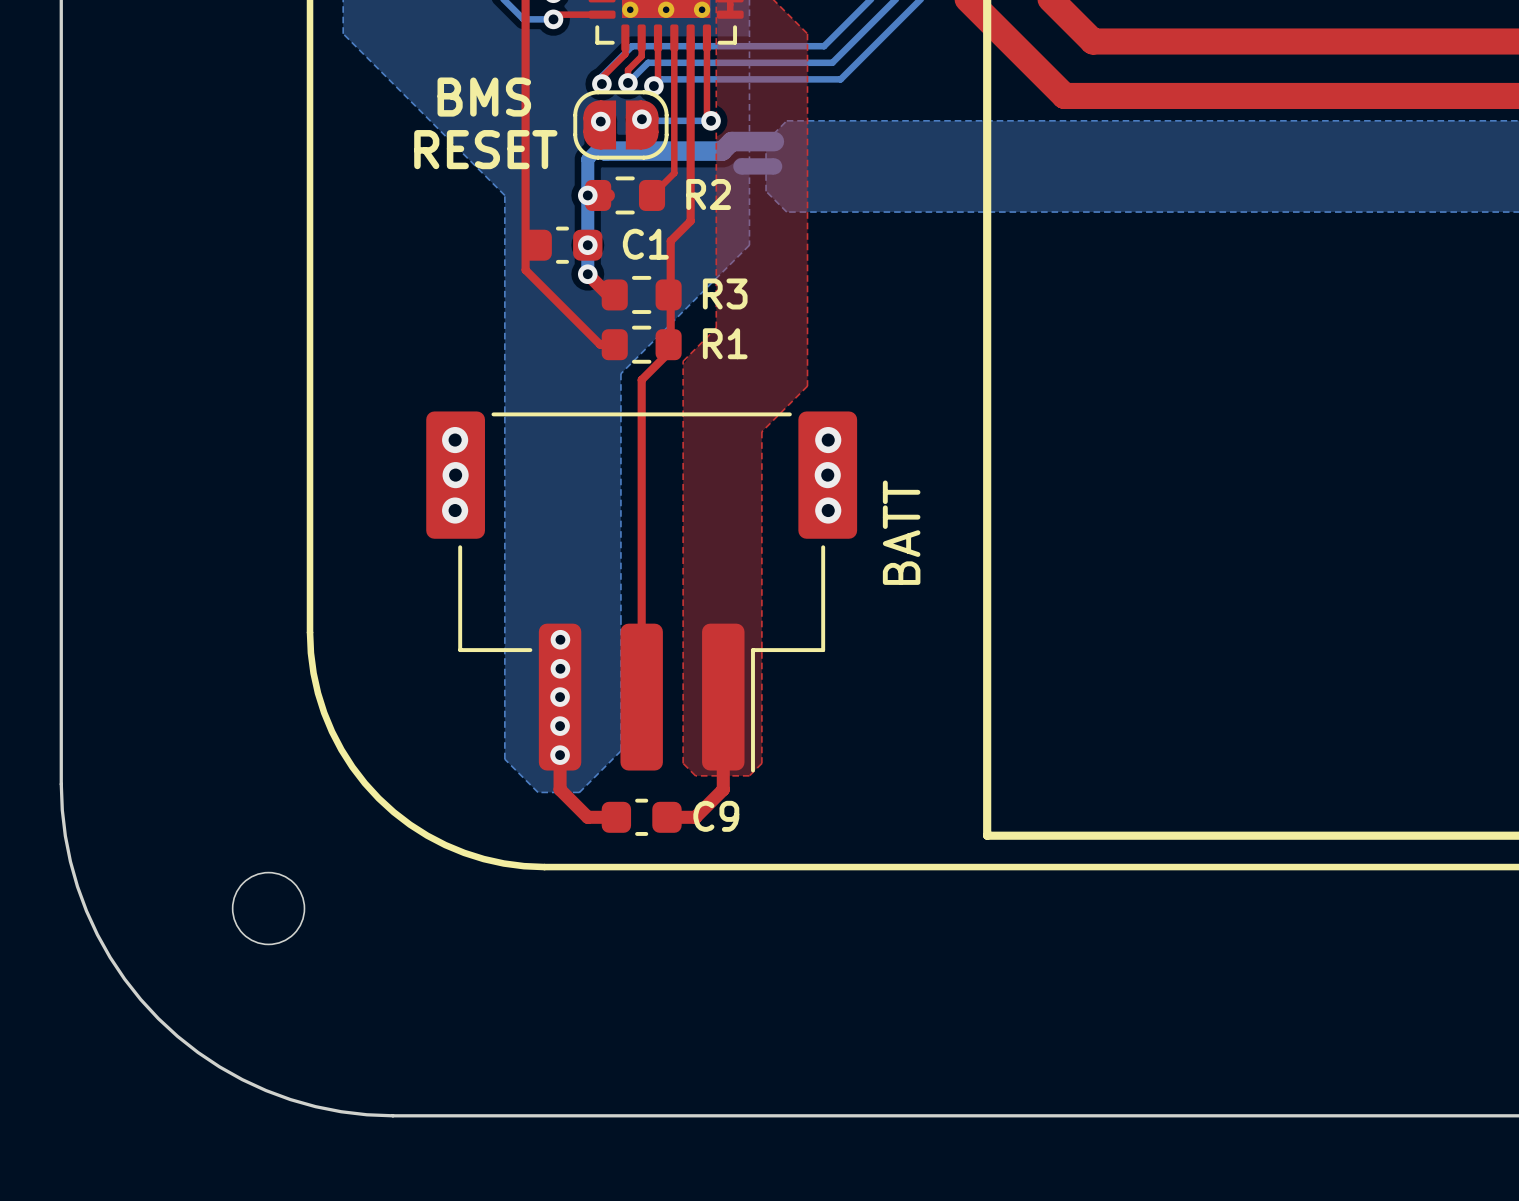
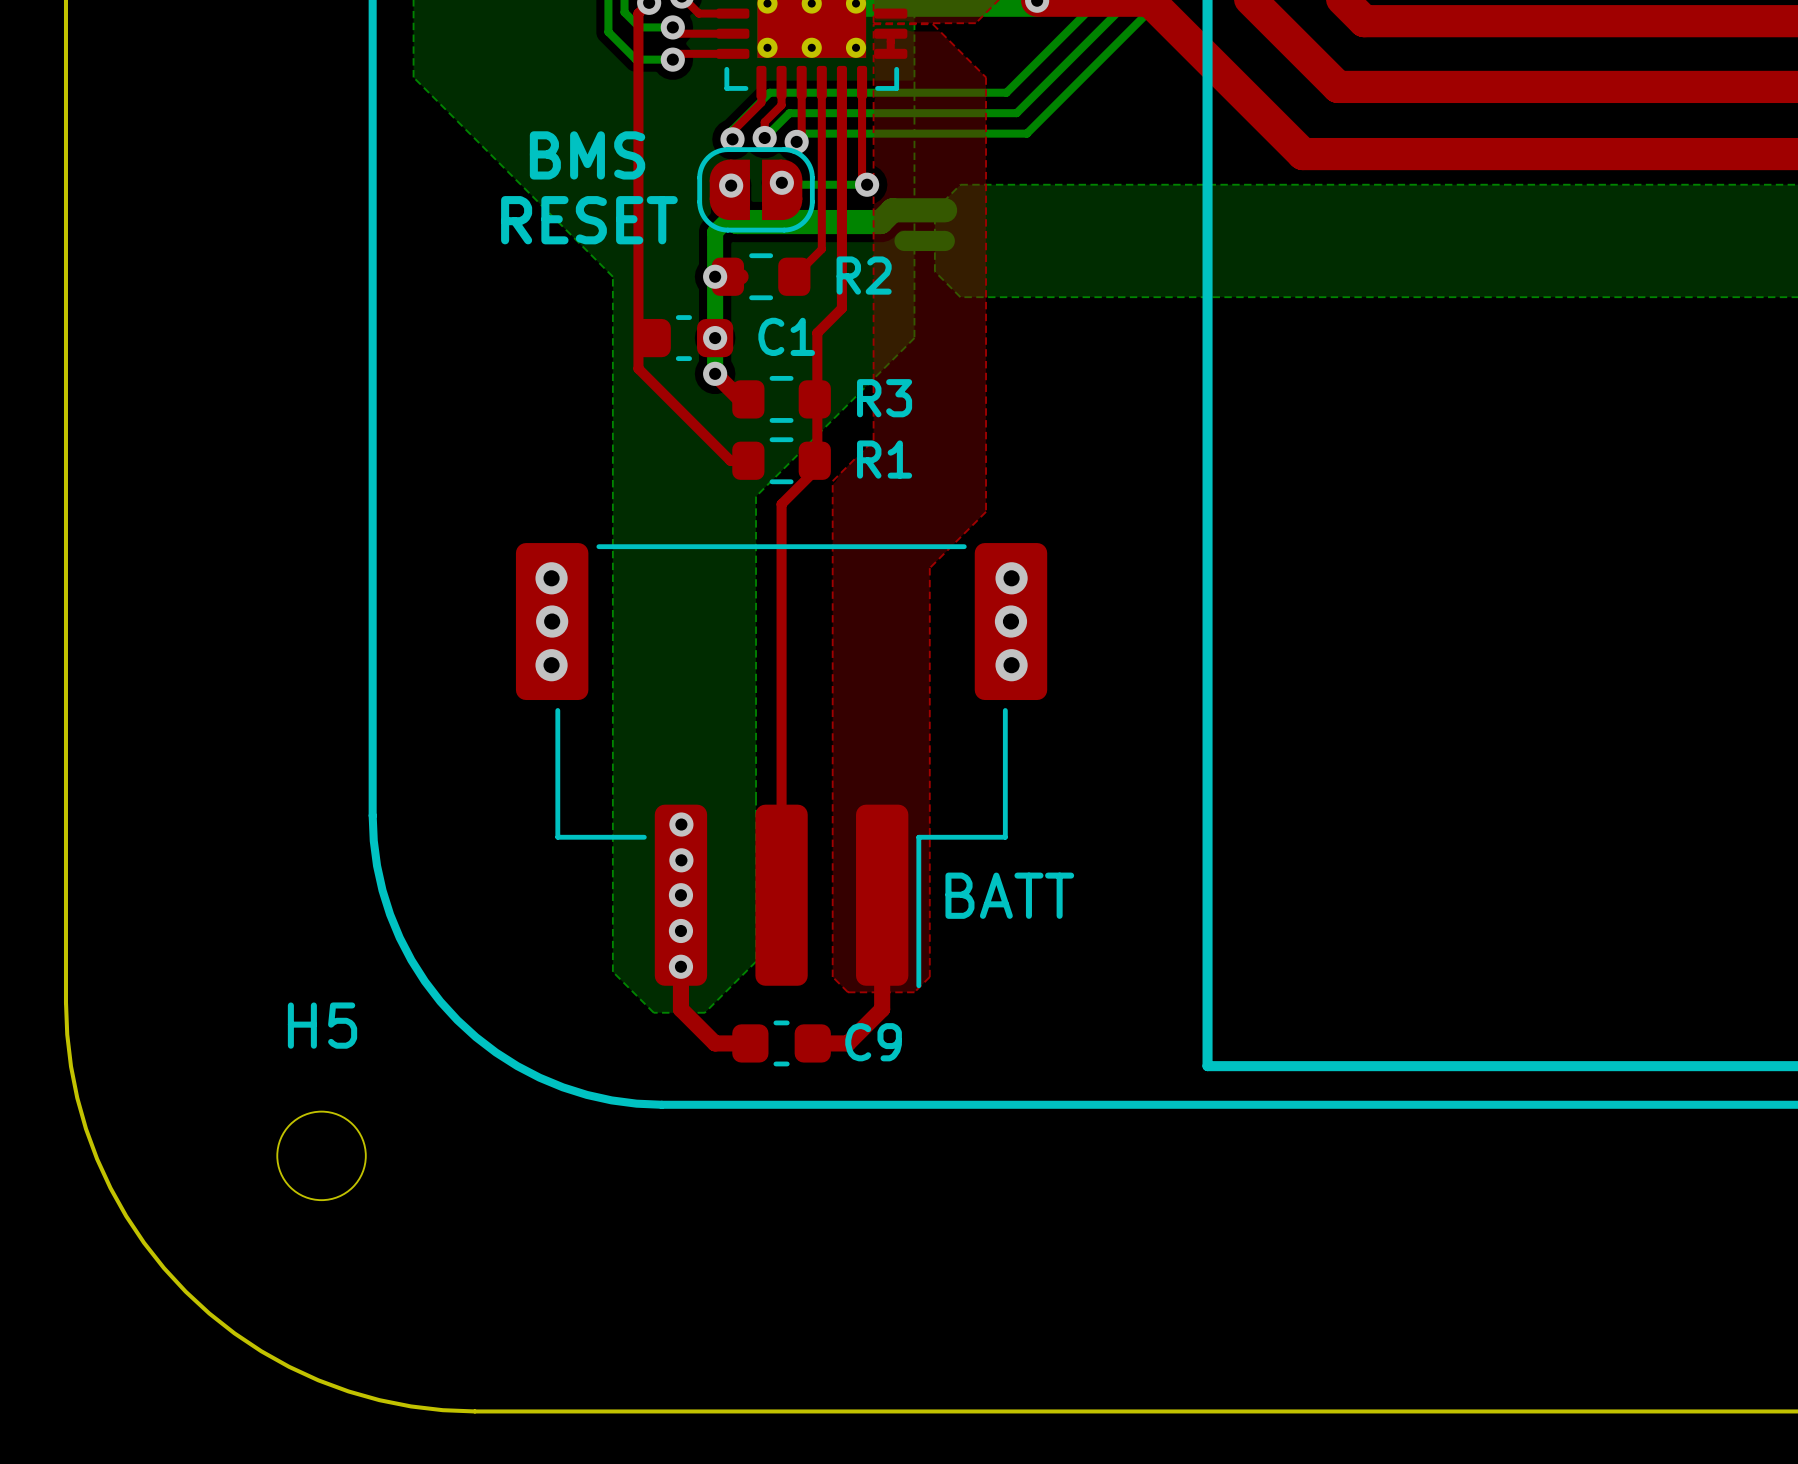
text rotation: 0° (901, 532) -> 90° clockwise (1009, 895)
text position: BATT (901, 532) -> BATT (1009, 895)
H5 name: none -> H5 (322, 1025)

